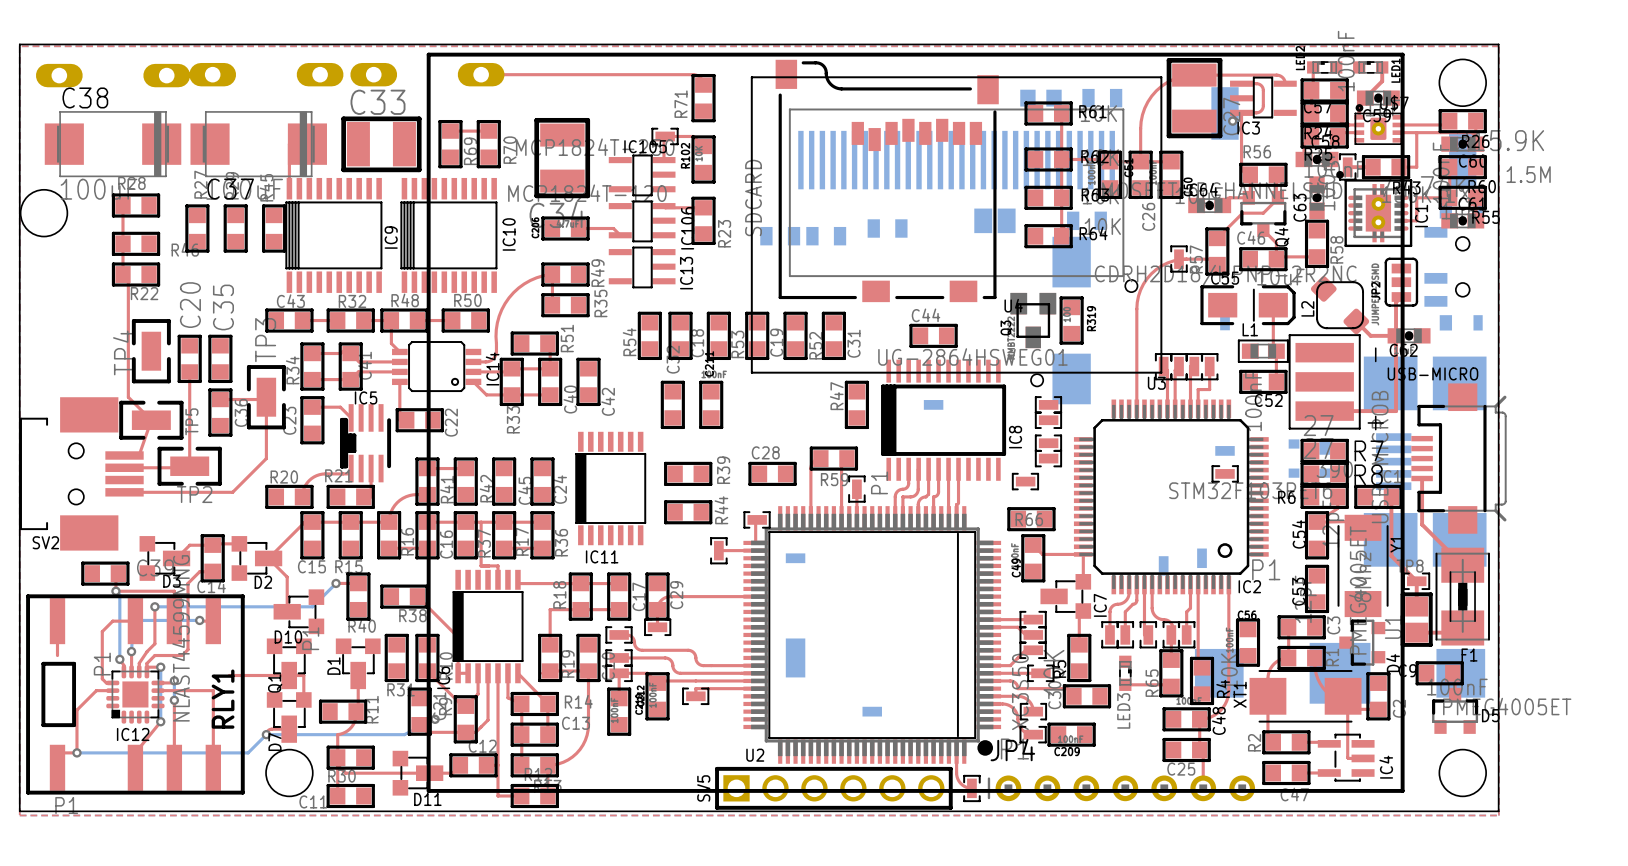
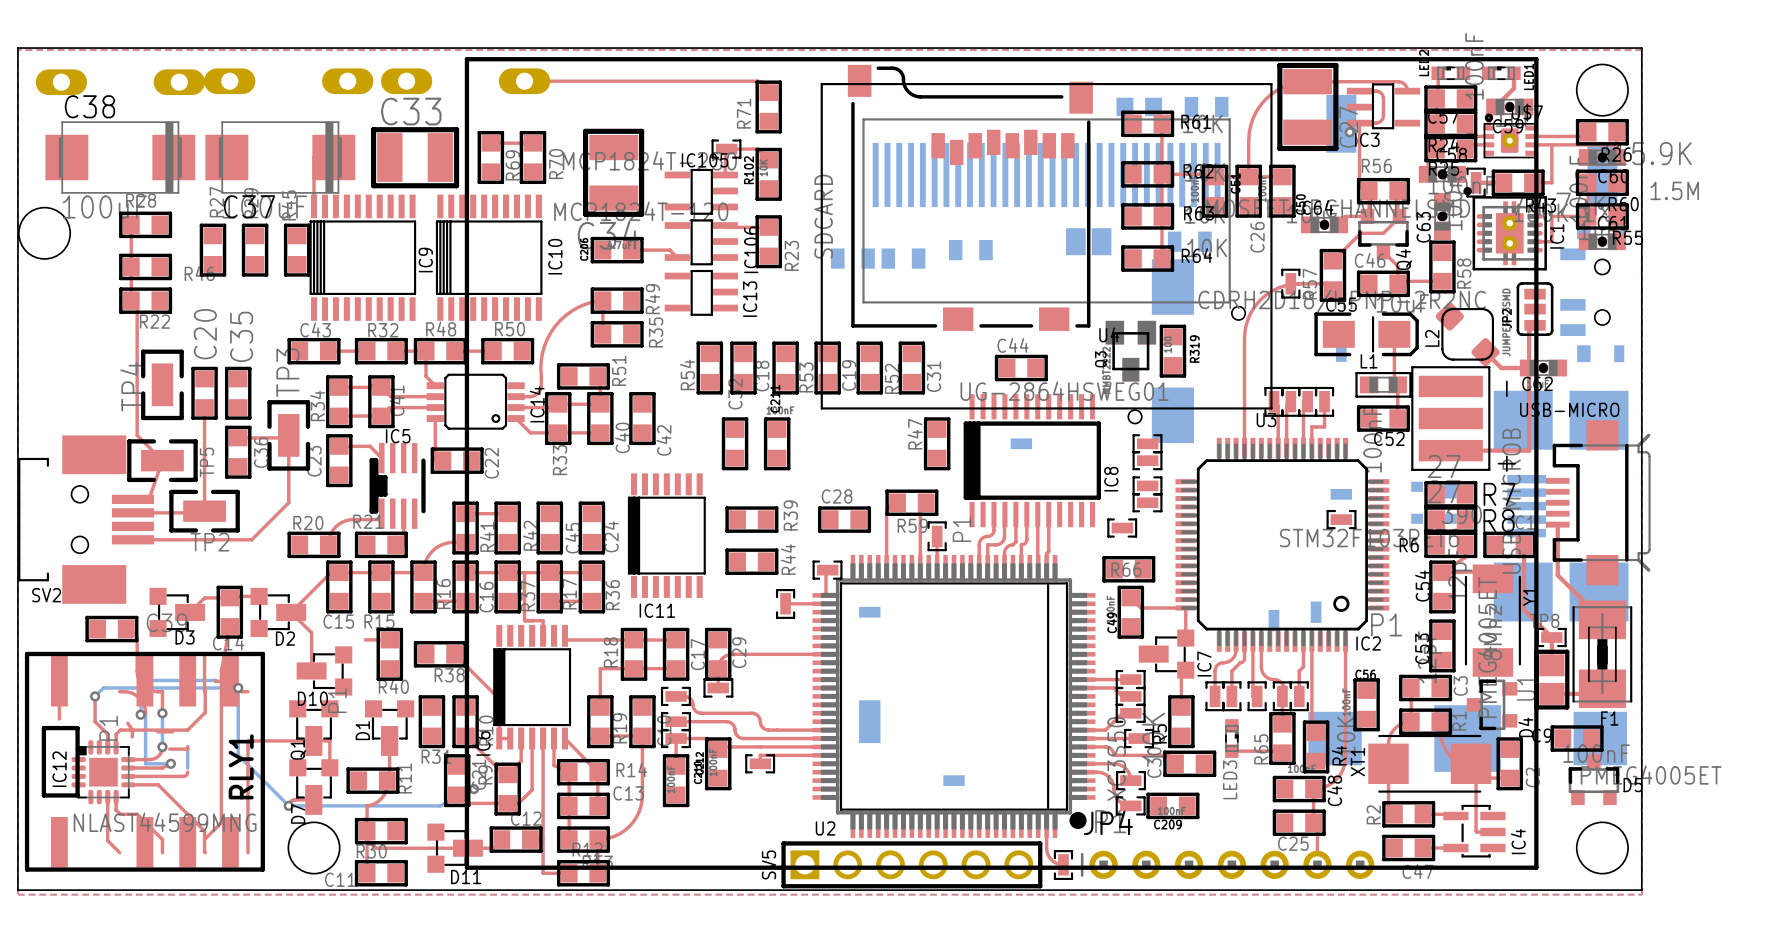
top track: (212, 571) (199, 571) (188, 583) (188, 649) (182, 655) (154, 655) (146, 663) (146, 671) -> (229, 626) (221, 671) (221, 822) (204, 839)
top track: (118, 573) (115, 573) (115, 591) (174, 591) (174, 621) -> (126, 629) (132, 631) (136, 637) (137, 673) (139, 681) (149, 690) (162, 691) (162, 713)
bottom track: (336, 583) (312, 606) (154, 606) -> none
via: (336, 583) -> none
bottom track: (115, 591) (119, 595) (119, 659) -> none
via: (115, 591) -> none
top track: none -> (204, 654) (205, 712) (187, 730) (120, 730) (116, 734) (116, 747)
top track: (154, 606) (154, 643) (139, 663) (139, 671) -> none
via: (154, 606) -> none
via position: (199, 620) -> (238, 688)
top track: (135, 621) (112, 621) (102, 631) (102, 678) (106, 682) (112, 682) -> none
top track: none -> (238, 688) (241, 691) (248, 691)
top track: none -> (119, 691) (129, 692) (137, 696) (143, 705) (145, 713)
top track: none -> (95, 696) (95, 721) (107, 734) (107, 747)
via: none -> (95, 696)
bottom track: none -> (145, 713) (145, 763) (170, 763)
bottom track: none -> (162, 713) (162, 746)
via: none -> (162, 713)
top track: (131, 651) (131, 671) -> none
via: (119, 659) -> none
bottom track: (160, 667) (160, 721) -> none
via: (160, 667) -> none
top track: none -> (248, 740) (248, 852)
top track: none -> (162, 746) (159, 754) (154, 758) (128, 759)
via: none -> (162, 746)
via: (174, 680) -> none
top track: (112, 690) (96, 690) (76, 710) (76, 752) (57, 752) (57, 767) -> none
top track: (158, 690) (213, 690) (213, 772) -> none
IC12 rotation: 0° (135, 694) -> 90° clockwise (103, 772)
IC12 position: (135, 694) -> (103, 772)
top track: none -> (170, 763) (162, 768) (128, 768)
via: none -> (170, 763)
top track: (174, 700) (174, 767) -> none
via: (174, 700) -> none
top track: none -> (187, 772) (184, 776) (128, 776)
top track: none -> (128, 784) (158, 784) (204, 831) (205, 852)
top track: (160, 721) (135, 752) (135, 767) -> none
via: (160, 721) -> none
top track: none -> (107, 797) (107, 840) (119, 852)
top track: none -> (116, 797) (116, 810) (120, 814) (137, 814) (162, 839) (162, 852)
bottom track: (266, 734) (248, 752) (76, 752) -> (288, 805) (238, 755) (238, 688) (103, 688) (95, 696)
via: (76, 752) -> none
text: P1 (66, 805) -> none

